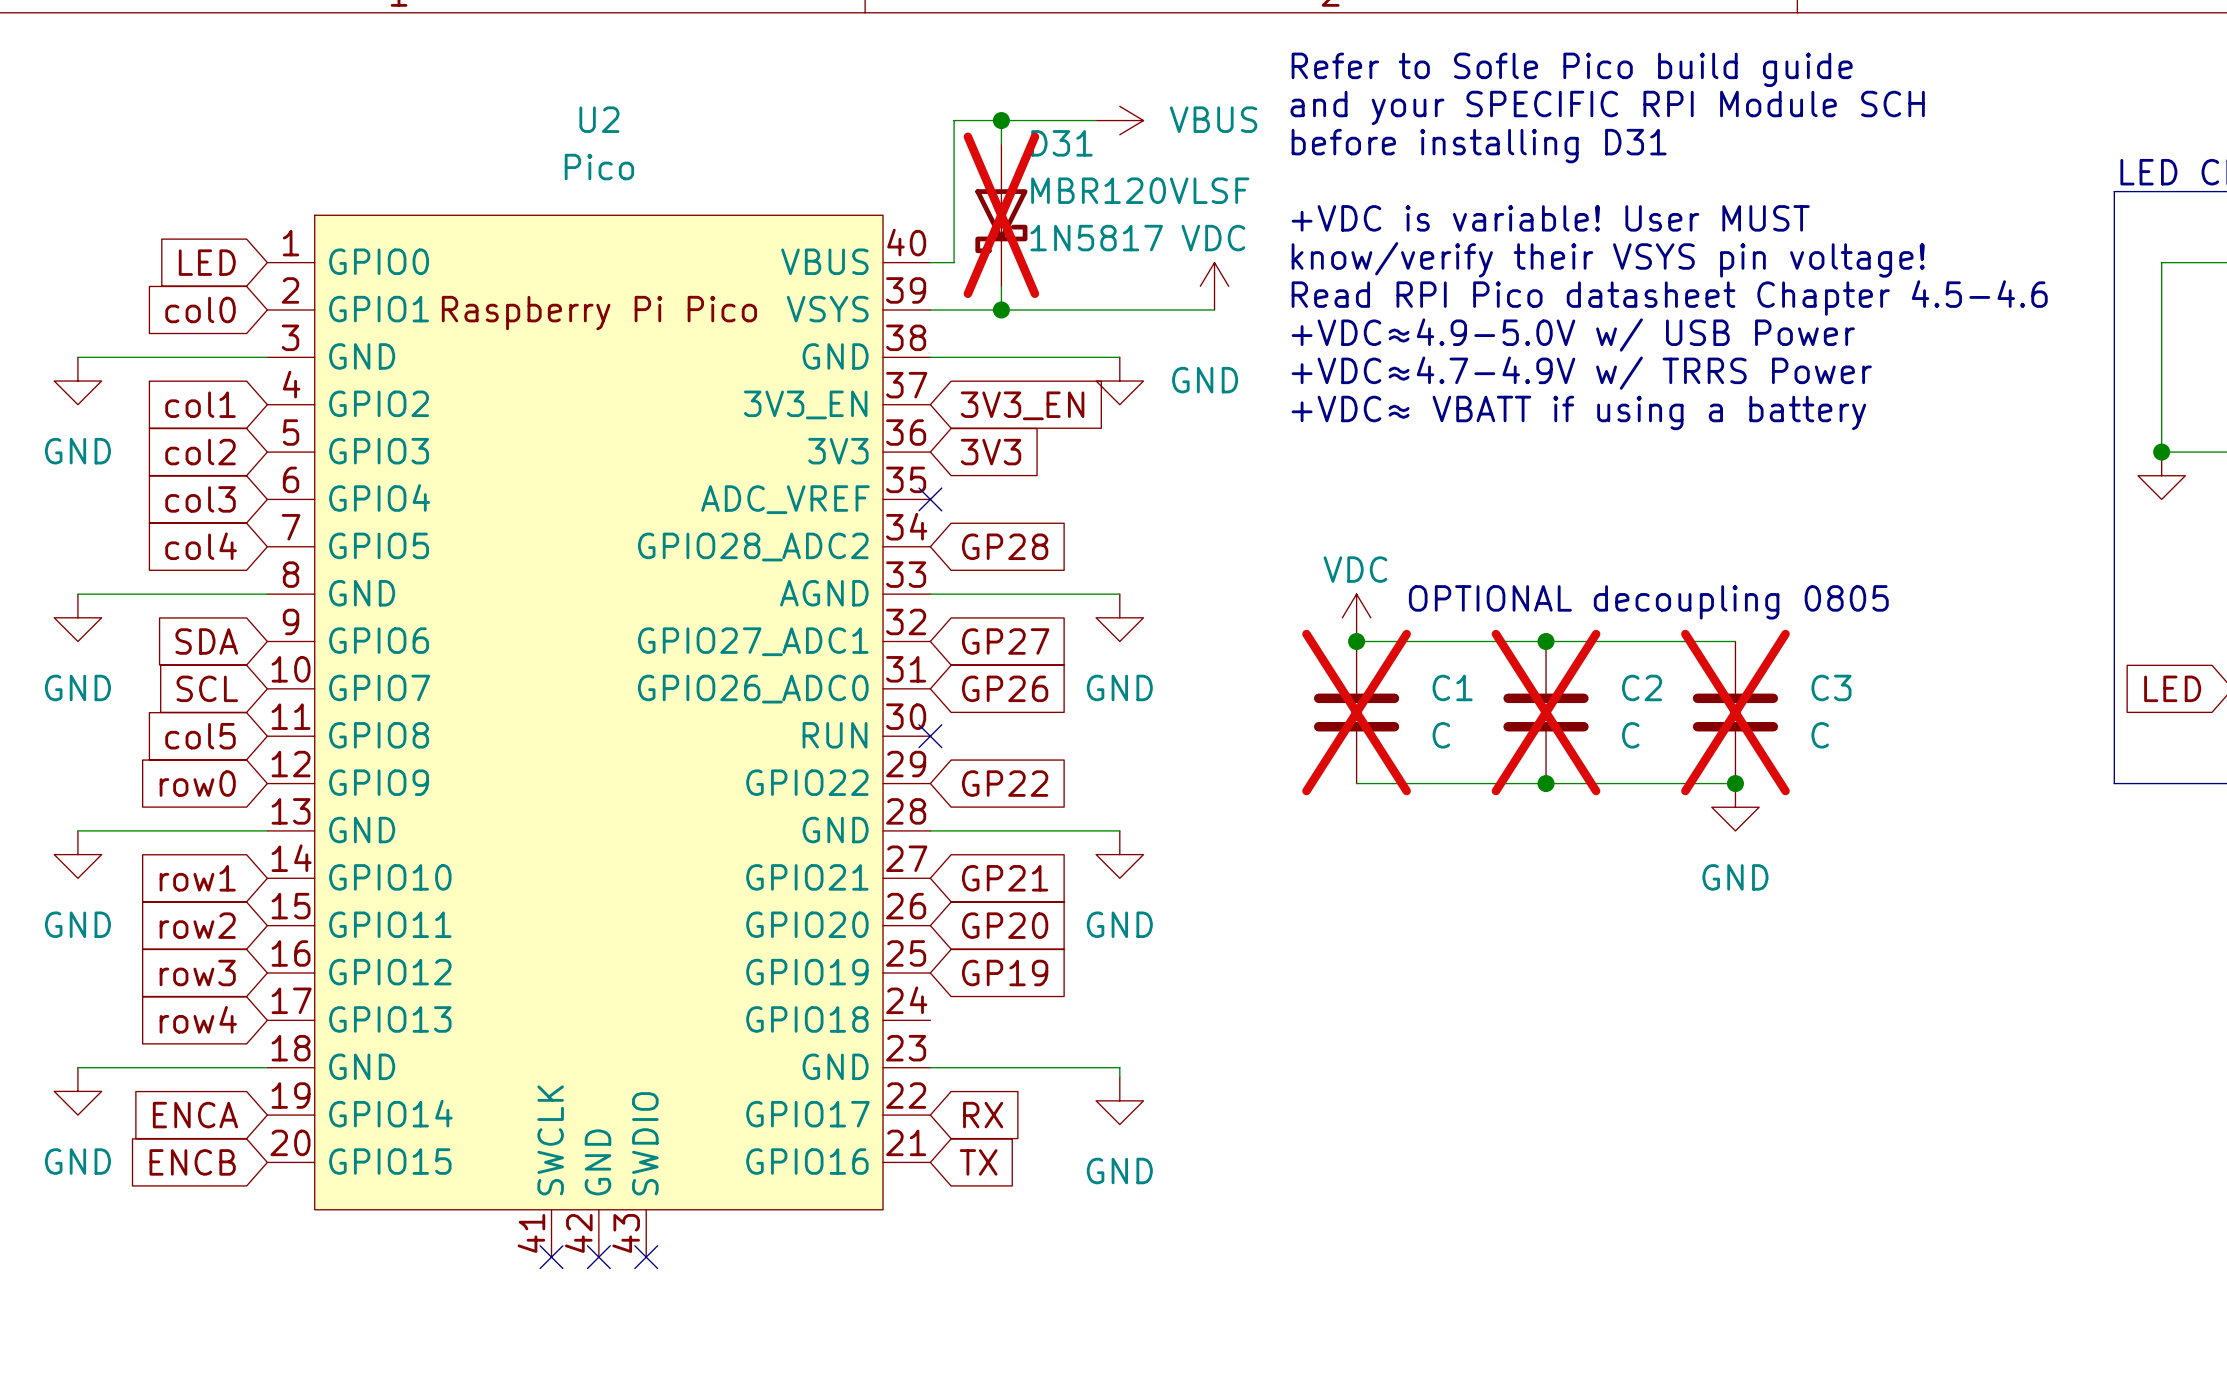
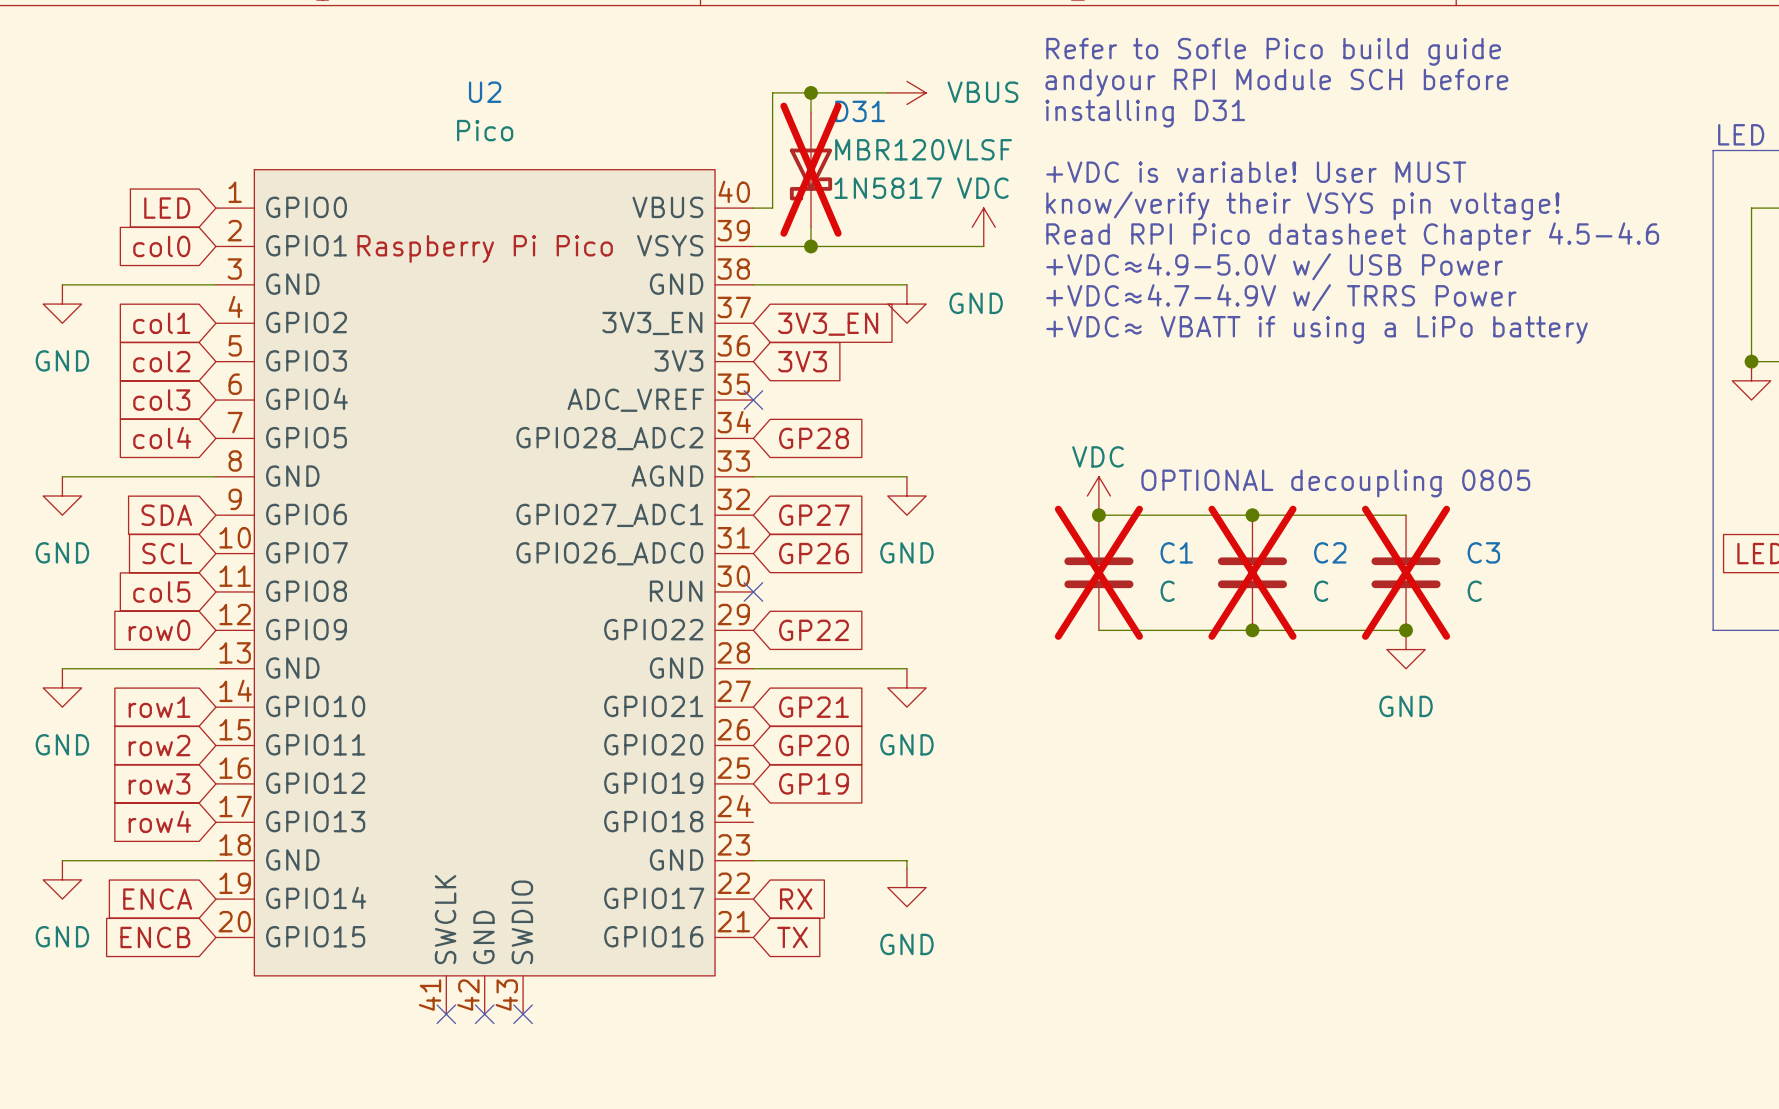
text: and your SPECIFIC RPI Module SCH (1607, 107) -> andyour RPI Module SCH before (1276, 82)
text: before installing D31 (1479, 146) -> installing D31 (1145, 113)
text: +VDC≈ VBATT if using a battery (1578, 412) -> +VDC≈ VBATT if using a LiPo battery (1317, 329)

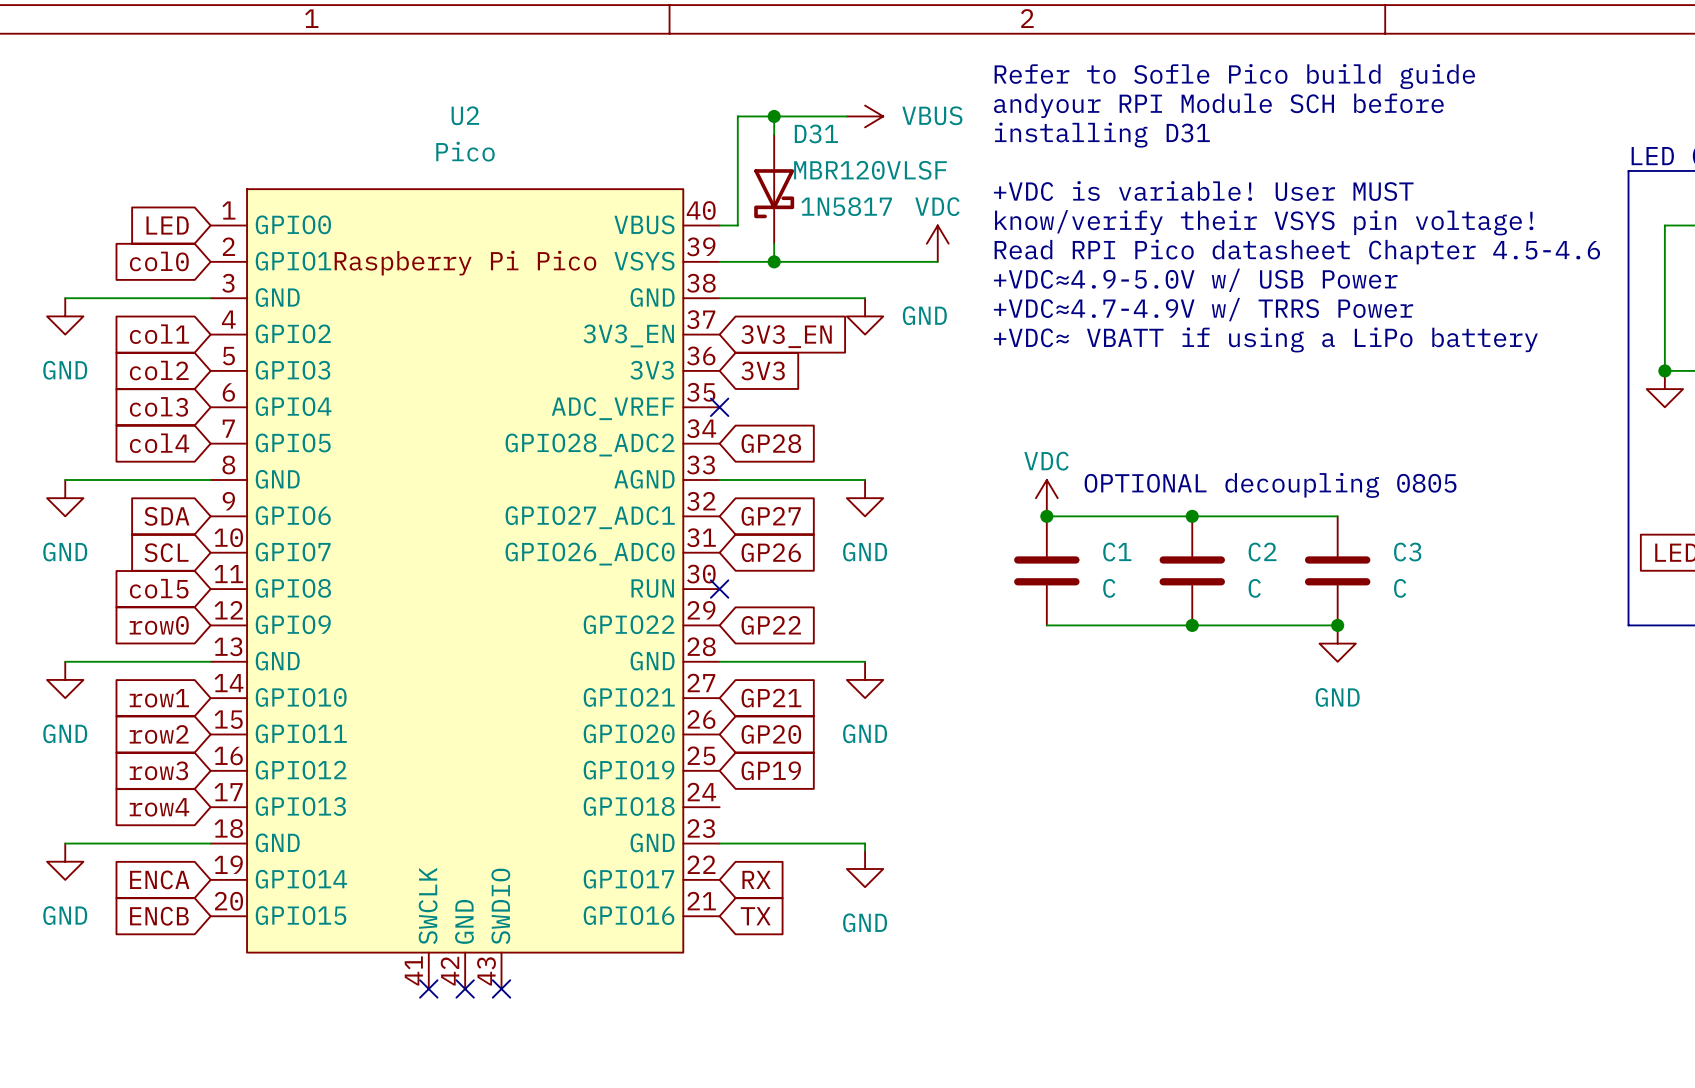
D31 do-not-place cross: (810, 169) -> none
C1 do-not-place cross: (1098, 572) -> none
C2 do-not-place cross: (1252, 572) -> none
C3 do-not-place cross: (1406, 572) -> none

